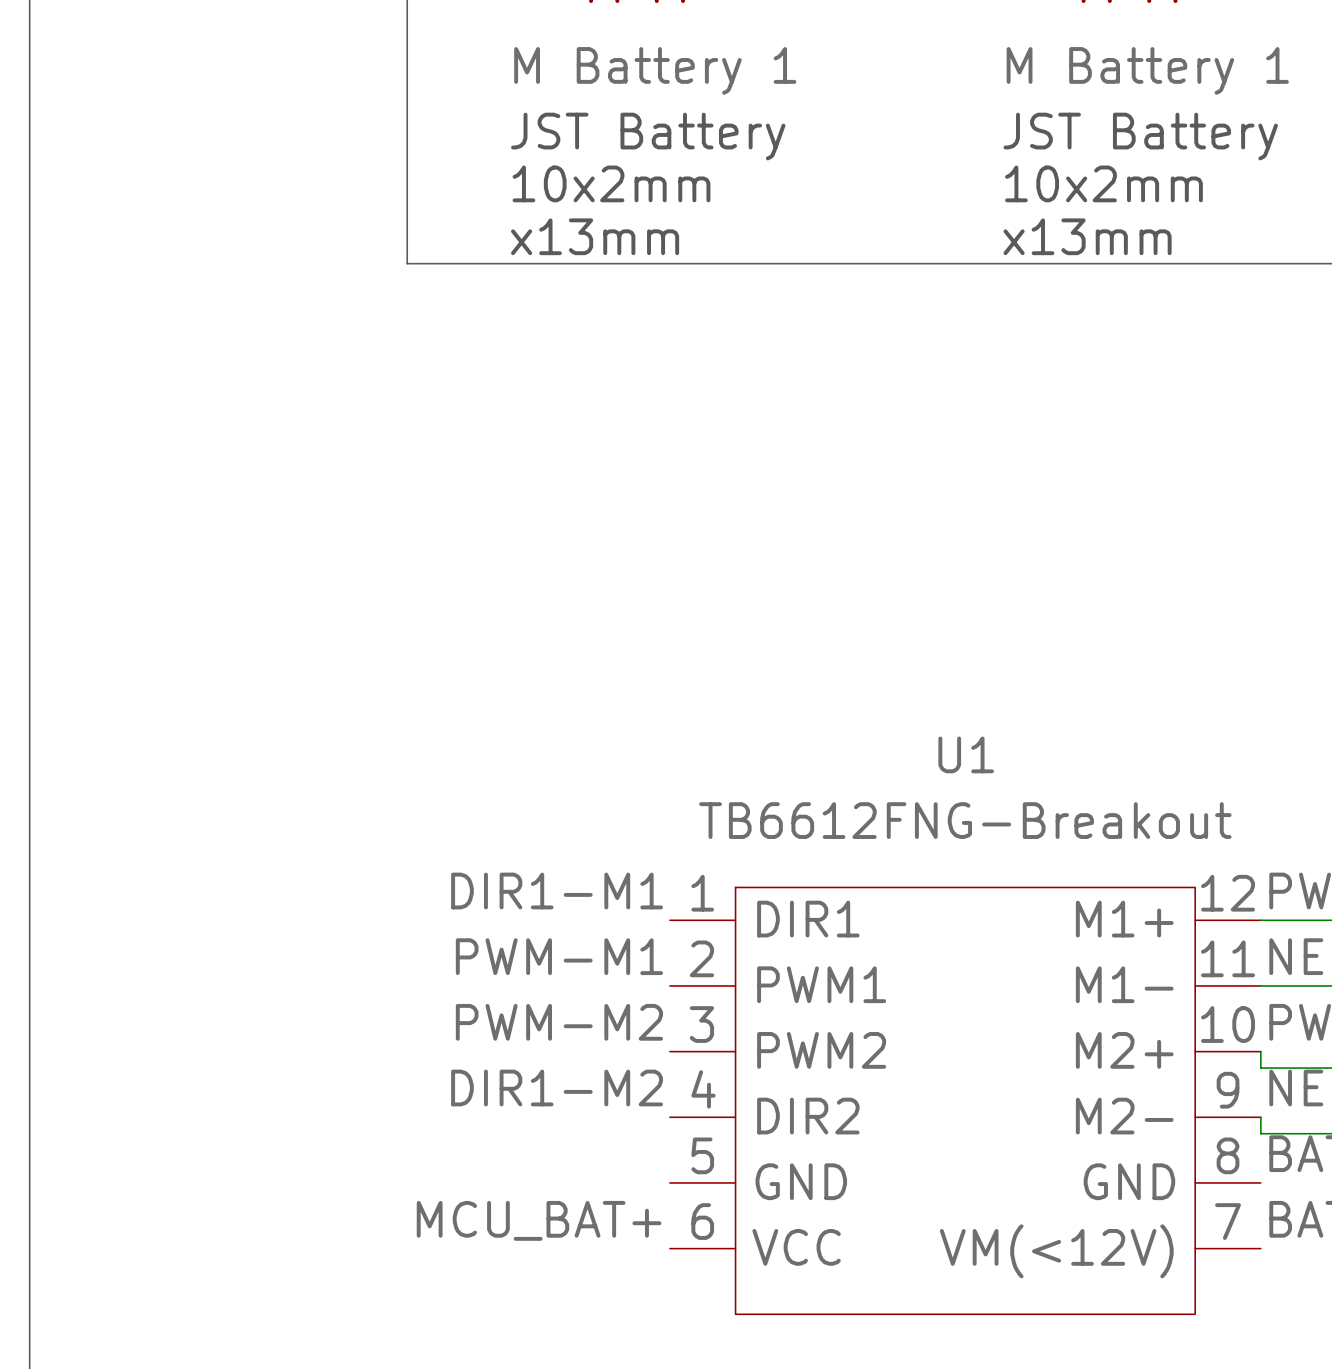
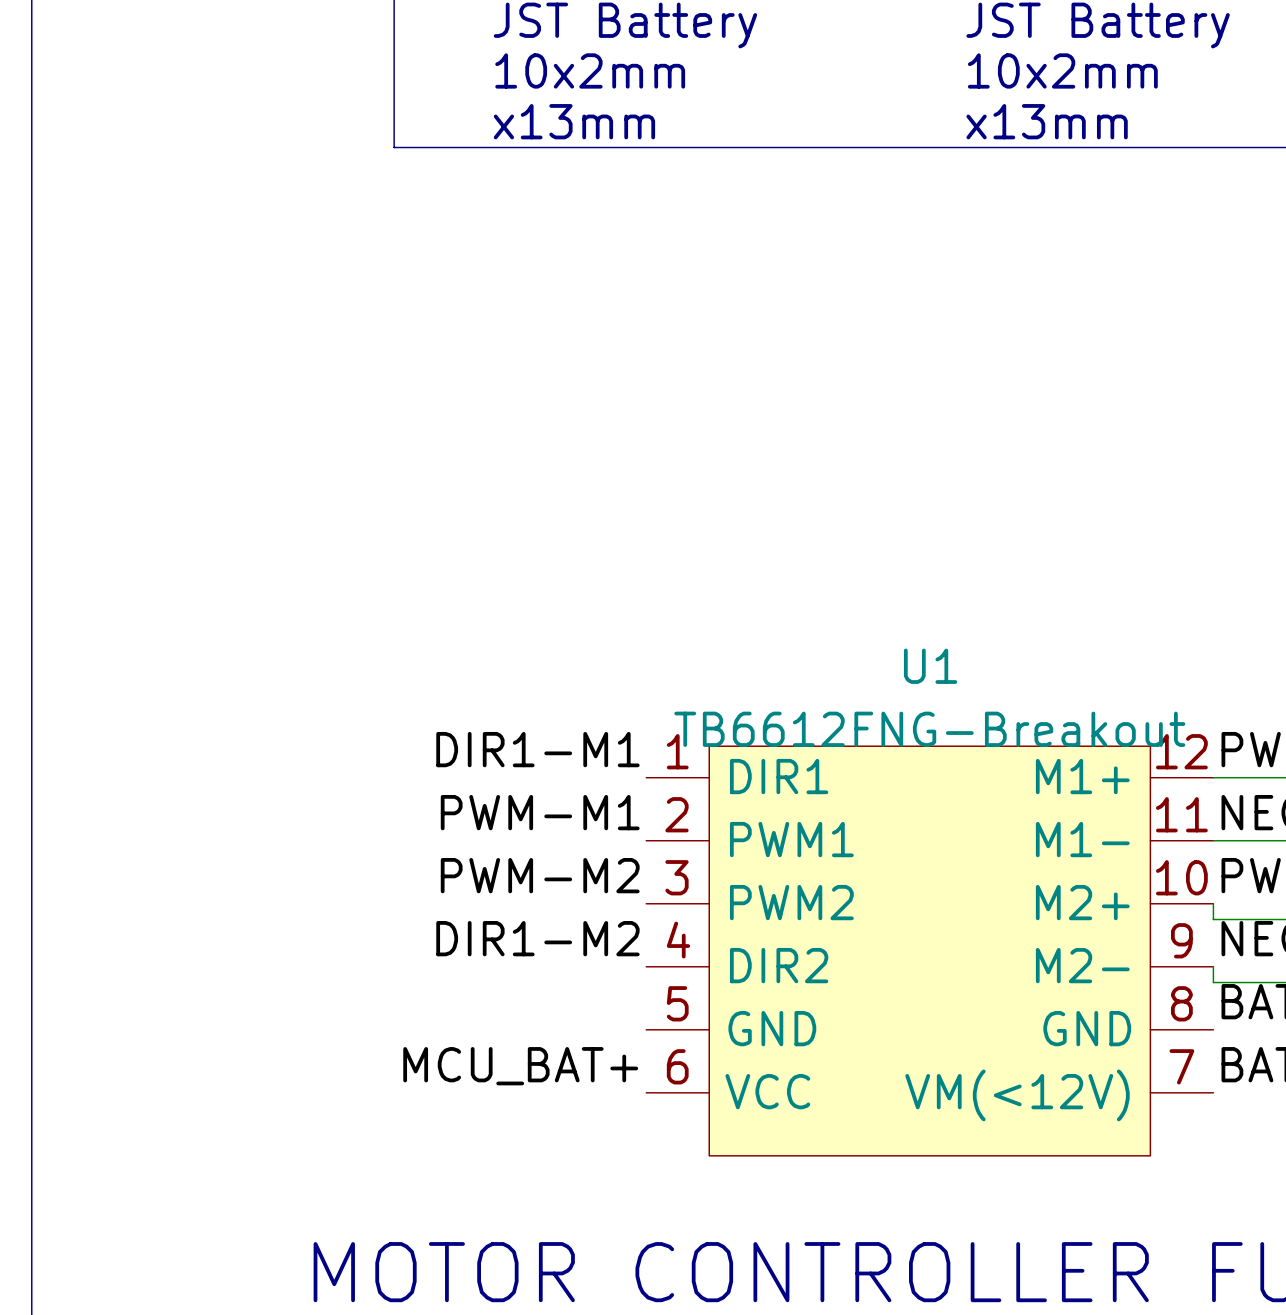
U1 name position: U1 (966, 754) -> U1 (930, 666)
U1 value position: TB6612FNG-Breakout (965, 820) -> TB6612FNG-Breakout (929, 729)

